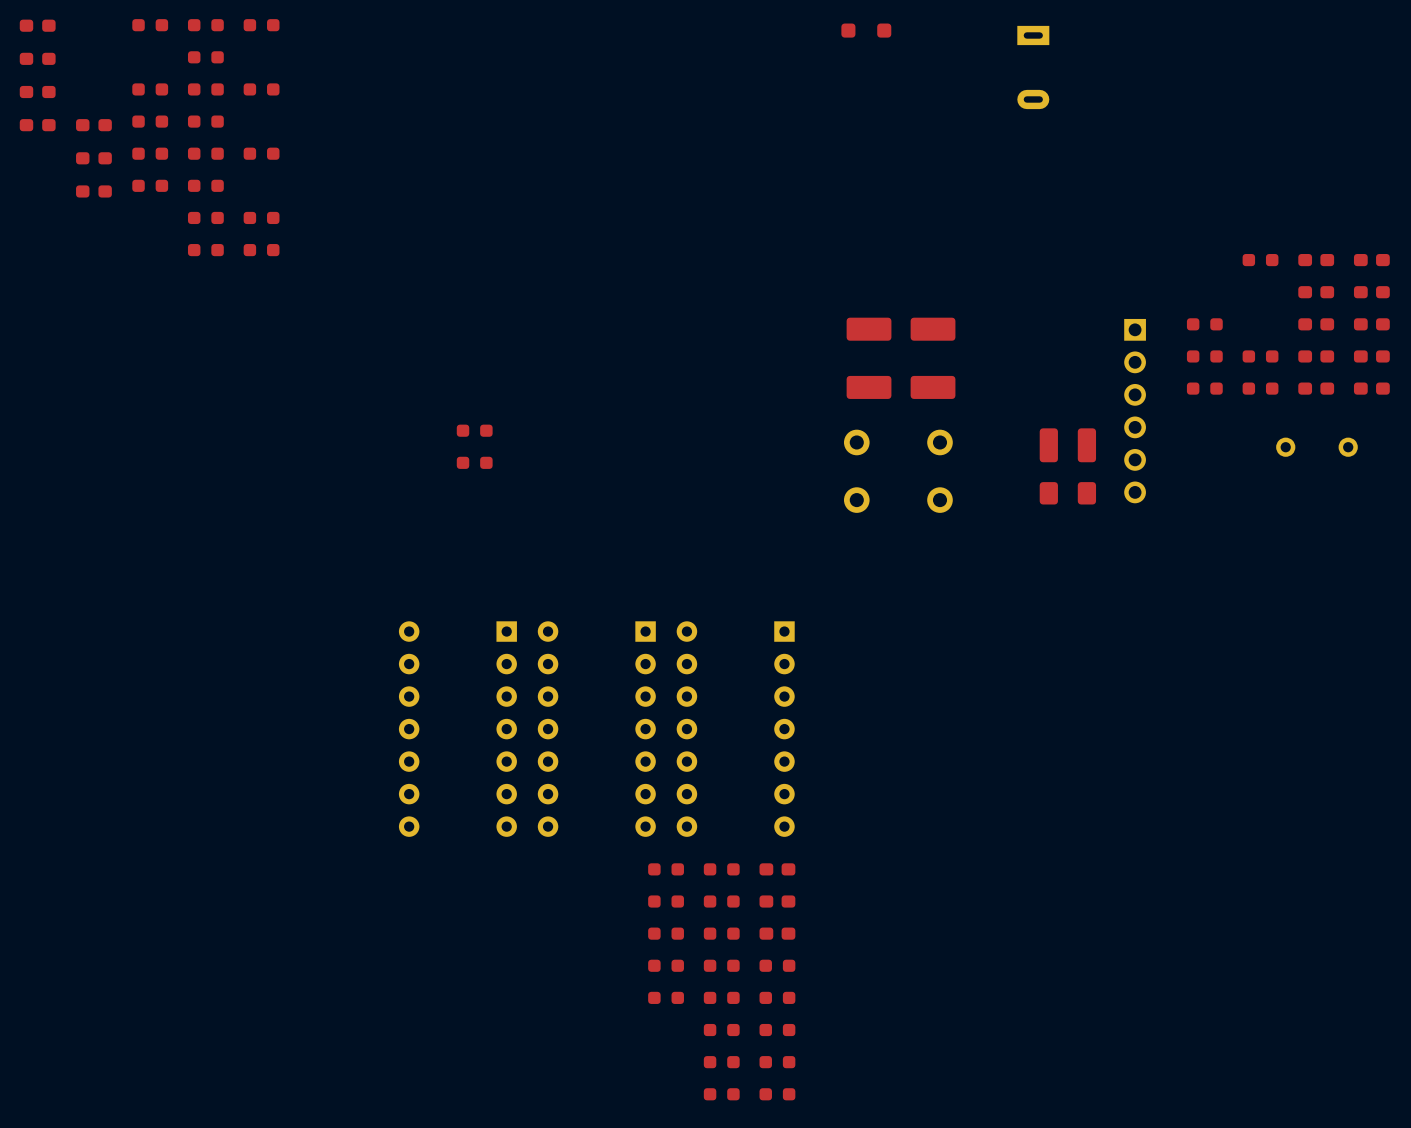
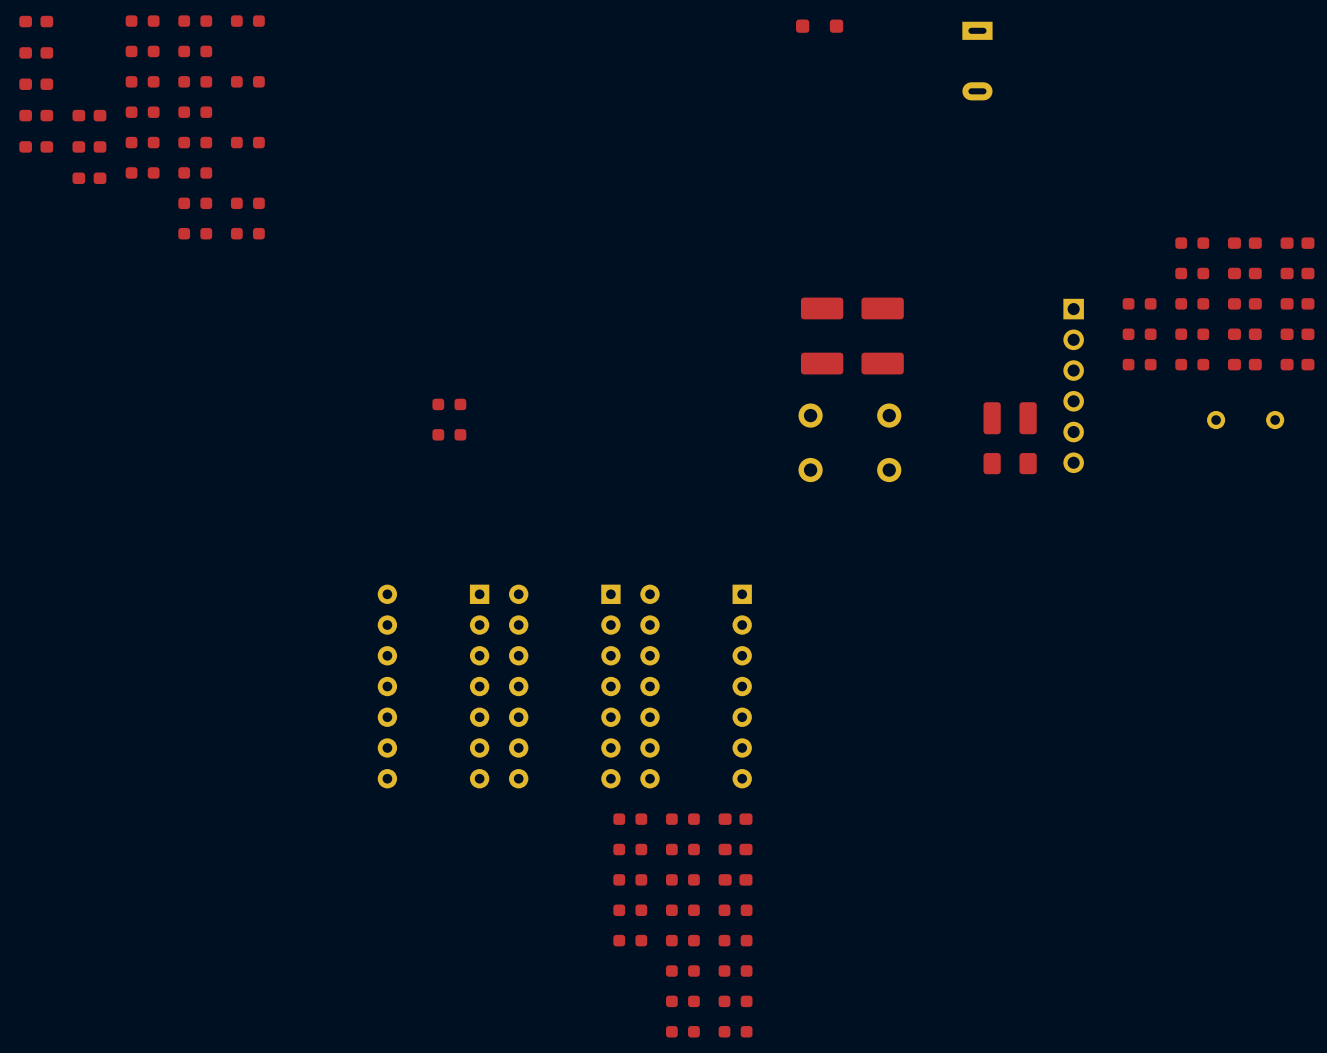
part: none -> (142, 51)
part: none -> (36, 146)
part: none -> (1192, 273)
part: none -> (1192, 303)

